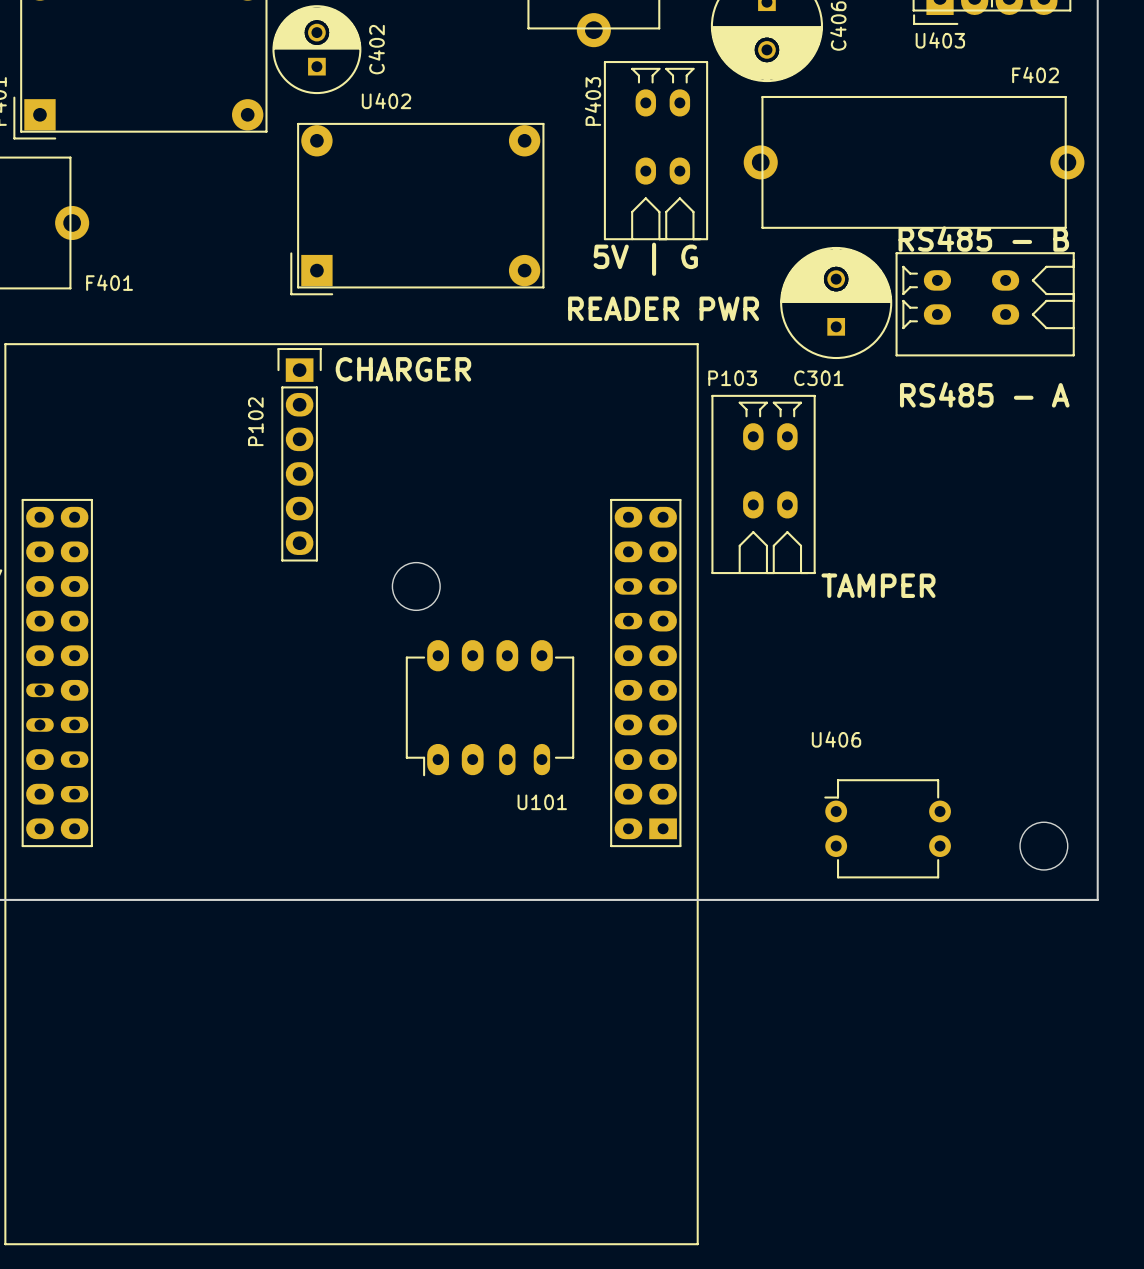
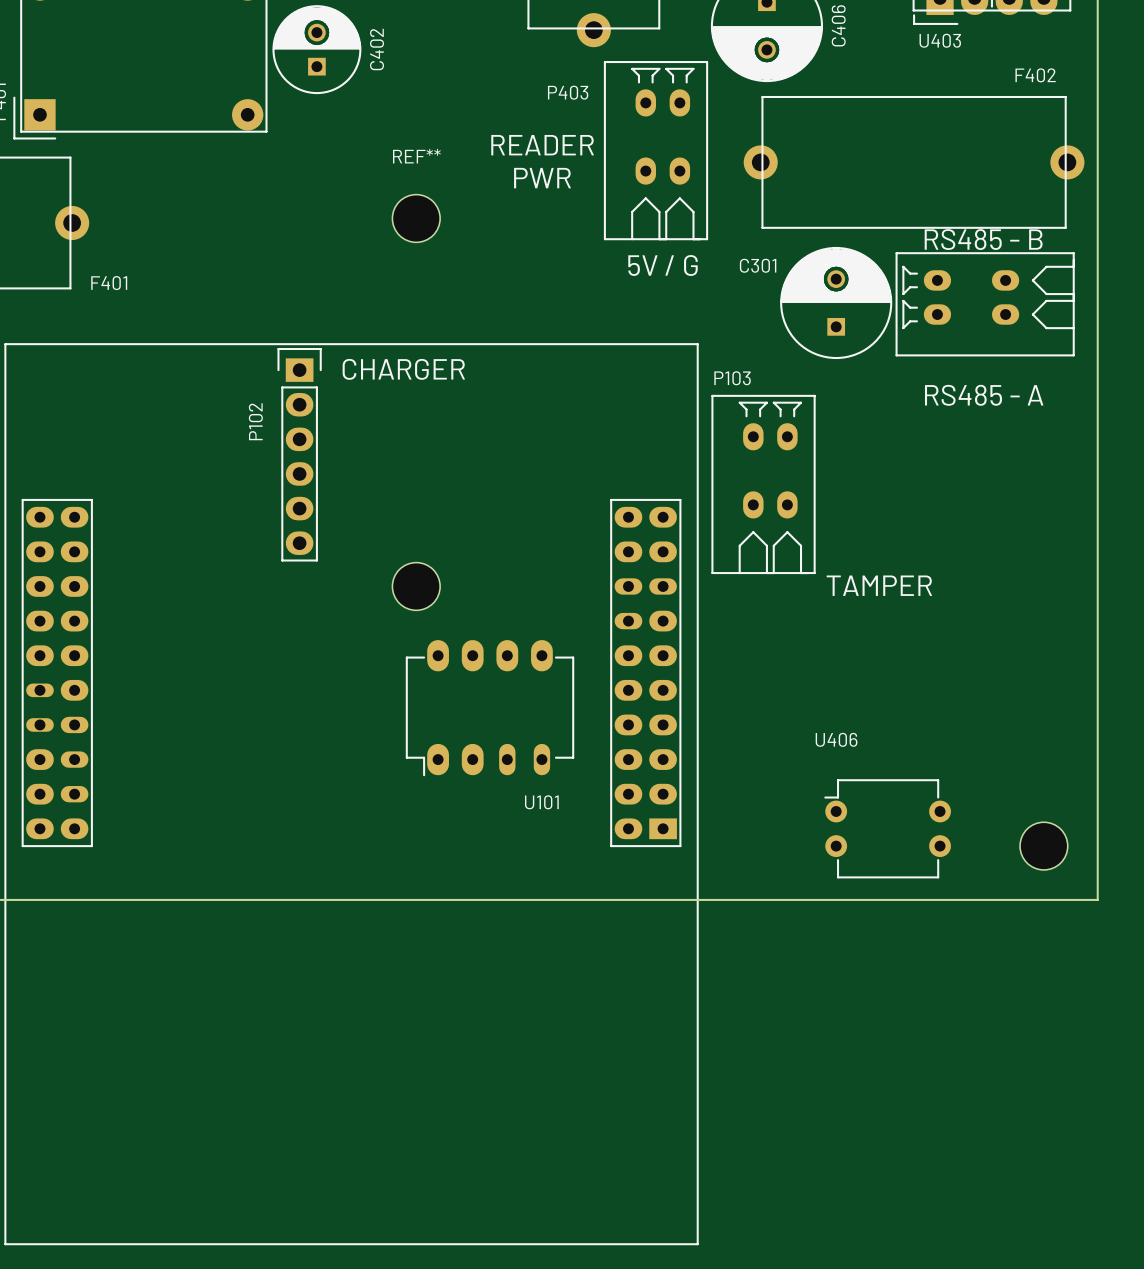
P403 name rotation: 0° (593, 101) -> 90° clockwise (568, 92)
text: none -> READER (542, 145)
text: none -> PWR (542, 178)
U402: (417, 209) -> none
REF**: none -> (416, 218)
text: 5V | G (645, 259) -> 5V / G (663, 265)
text: READER PWR (663, 308) -> none
C301 name position: C301 (818, 378) -> C301 (758, 265)

